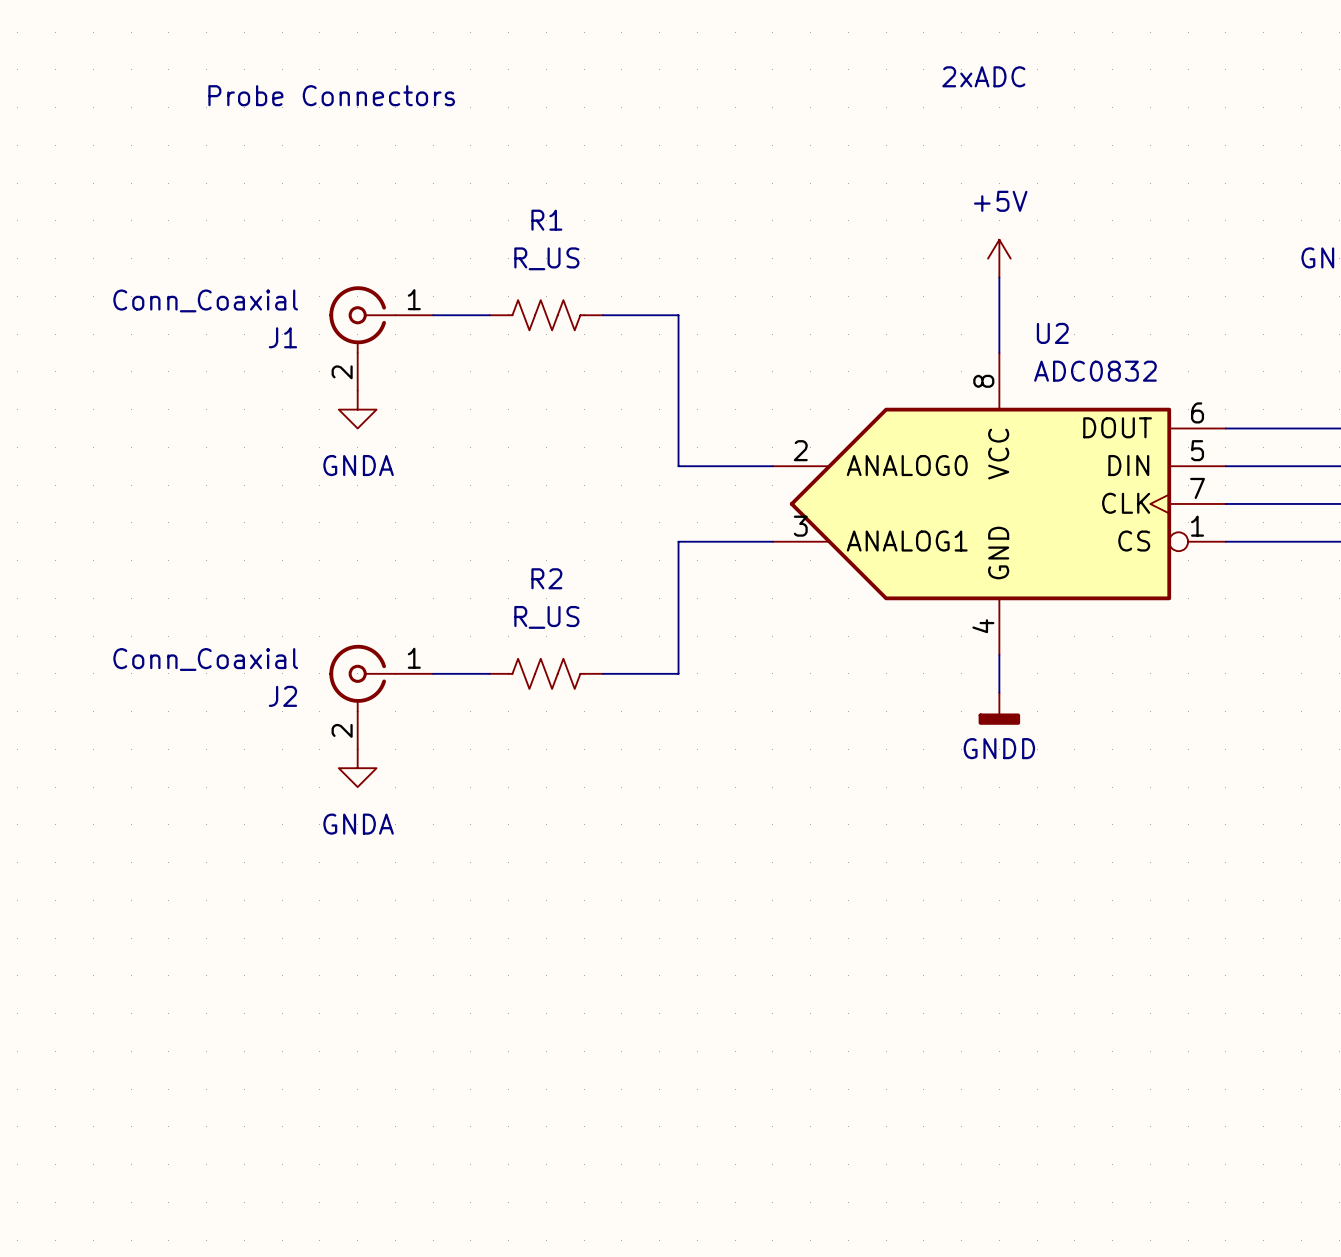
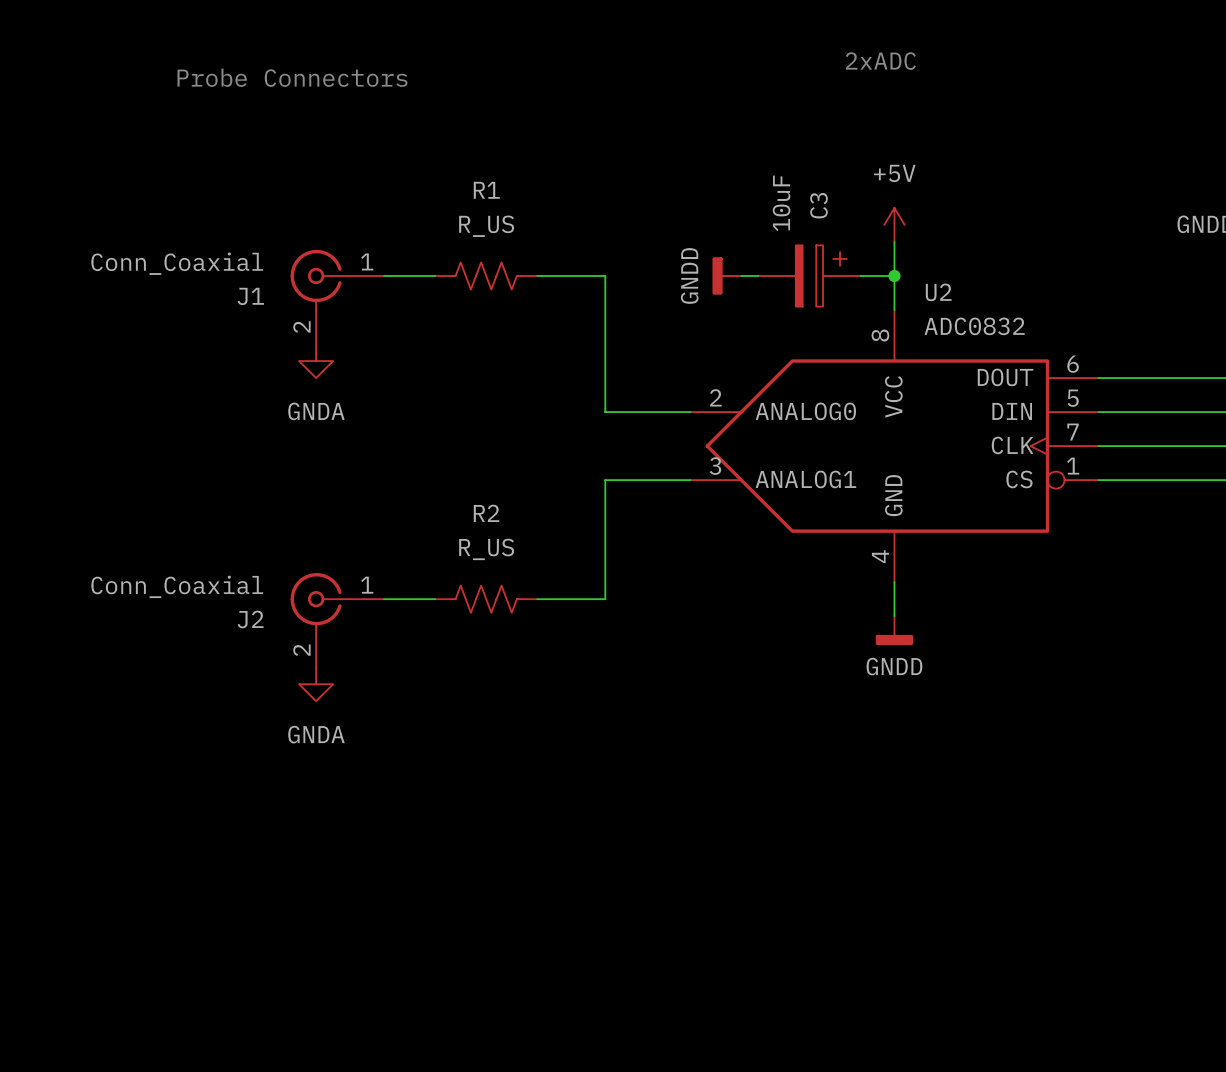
power symbol: none -> GNDD (726, 275)
wire: none -> (741, 275) (758, 275)
C3: none -> 10uF (809, 275)
wire: none -> (860, 275) (894, 275)
junction: none -> (894, 275)

